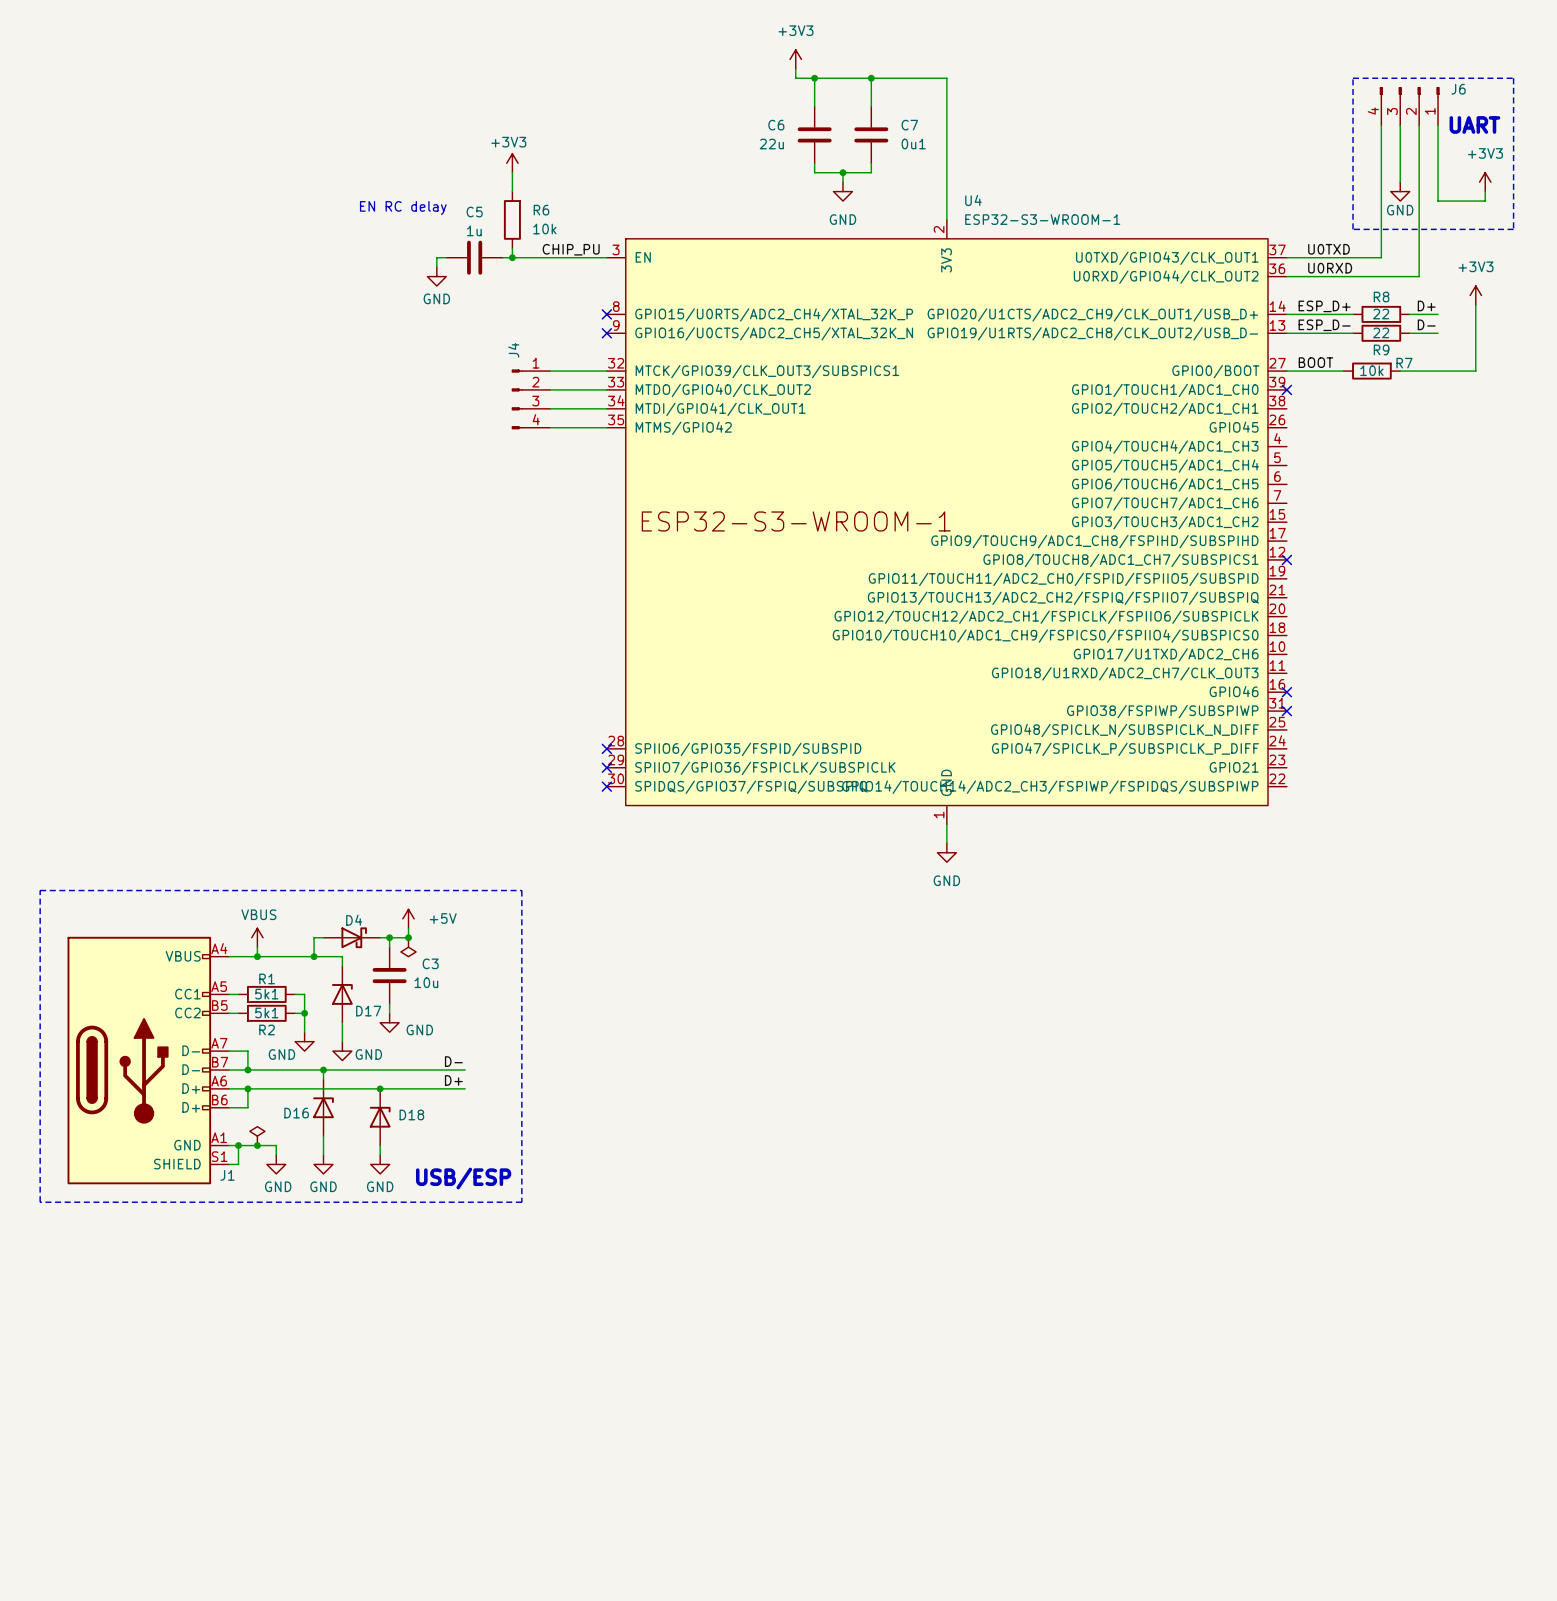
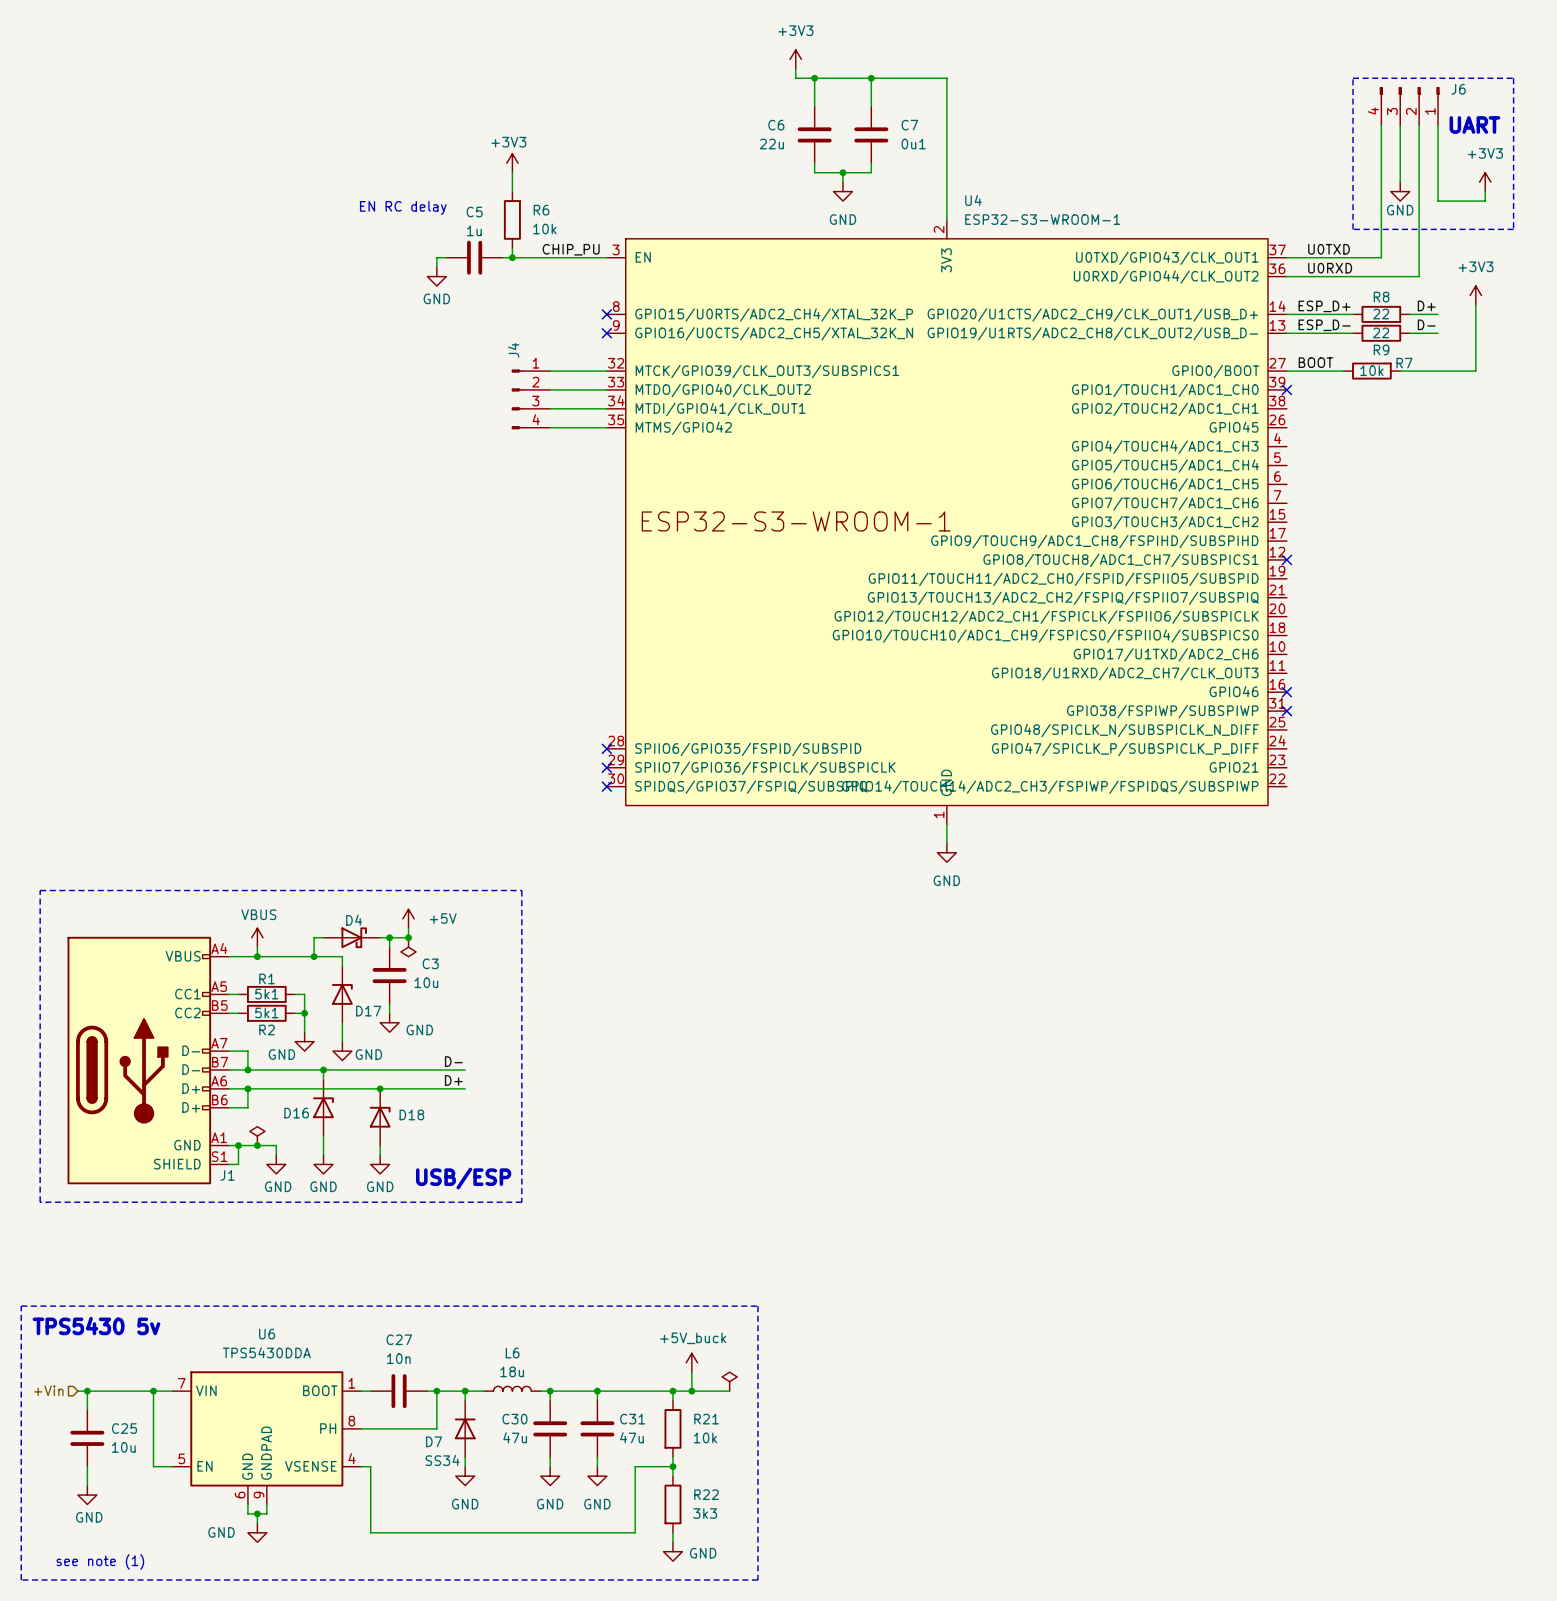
line: none -> (21, 1306) (757, 1306) (757, 1580) (21, 1580) (21, 1306)
text: none -> TPS5430 5v (96, 1326)
power symbol: none -> +5V_buck (691, 1362)
wire: none -> (691, 1372) (691, 1391)
power symbol: none -> (729, 1381)
L6: none -> 18u (512, 1388)
hierarchical label: none -> +Vin (48, 1390)
wire: none -> (77, 1391) (172, 1391)
wire: none -> (87, 1391) (87, 1410)
junction: none -> (87, 1391)
wire: none -> (153, 1391) (153, 1466) (172, 1466)
junction: none -> (153, 1391)
wire: none -> (361, 1391) (370, 1391)
C27: none -> 10n (399, 1391)
wire: none -> (427, 1391) (484, 1391)
wire: none -> (436, 1391) (436, 1428) (361, 1428)
junction: none -> (436, 1391)
wire: none -> (465, 1391) (465, 1400)
junction: none -> (465, 1391)
wire: none -> (540, 1391) (729, 1391)
wire: none -> (550, 1391) (550, 1400)
junction: none -> (550, 1391)
wire: none -> (597, 1391) (597, 1400)
junction: none -> (597, 1391)
wire: none -> (672, 1391) (672, 1400)
junction: none -> (672, 1391)
junction: none -> (691, 1391)
D7: none -> SS34 (465, 1428)
C30: none -> 47u (550, 1428)
C31: none -> 47u (597, 1428)
R21: none -> 10k (672, 1428)
U6: none -> TPS5430DDA (266, 1437)
C25: none -> 10u (87, 1438)
wire: none -> (465, 1457) (465, 1466)
wire: none -> (550, 1457) (550, 1466)
wire: none -> (597, 1457) (597, 1466)
wire: none -> (672, 1457) (672, 1476)
wire: none -> (87, 1466) (87, 1485)
wire: none -> (361, 1466) (370, 1466) (370, 1532) (635, 1532) (635, 1466) (672, 1466)
junction: none -> (672, 1466)
power symbol: none -> GND (465, 1476)
power symbol: none -> GND (550, 1476)
power symbol: none -> GND (597, 1476)
power symbol: none -> GND (87, 1495)
wire: none -> (247, 1504) (247, 1513) (266, 1513) (266, 1504)
R22: none -> 3k3 (672, 1504)
wire: none -> (257, 1513) (257, 1523)
junction: none -> (257, 1513)
power symbol: none -> GND (257, 1532)
wire: none -> (672, 1532) (672, 1542)
power symbol: none -> GND (672, 1551)
text: none -> see note (1) (100, 1561)

